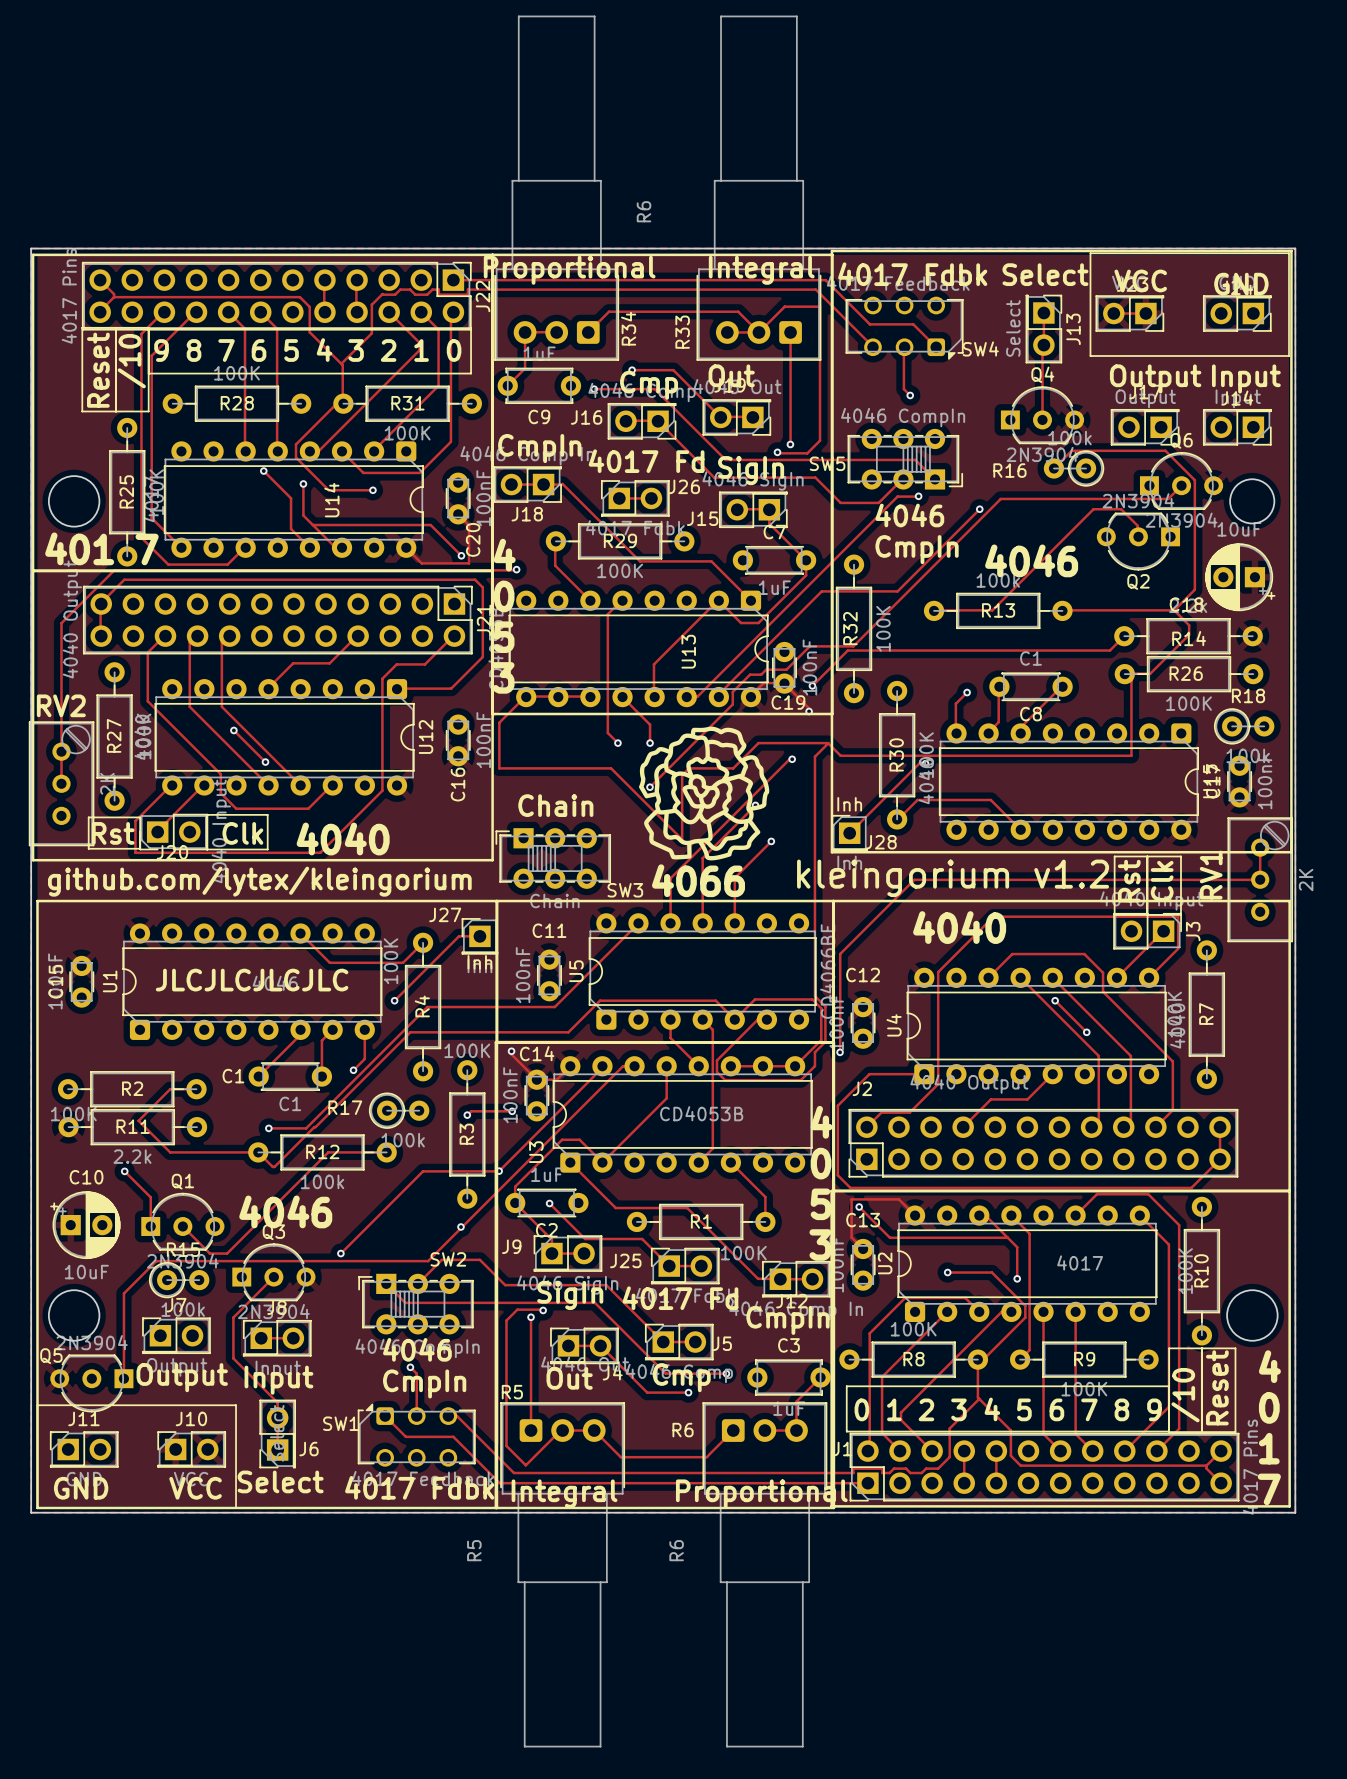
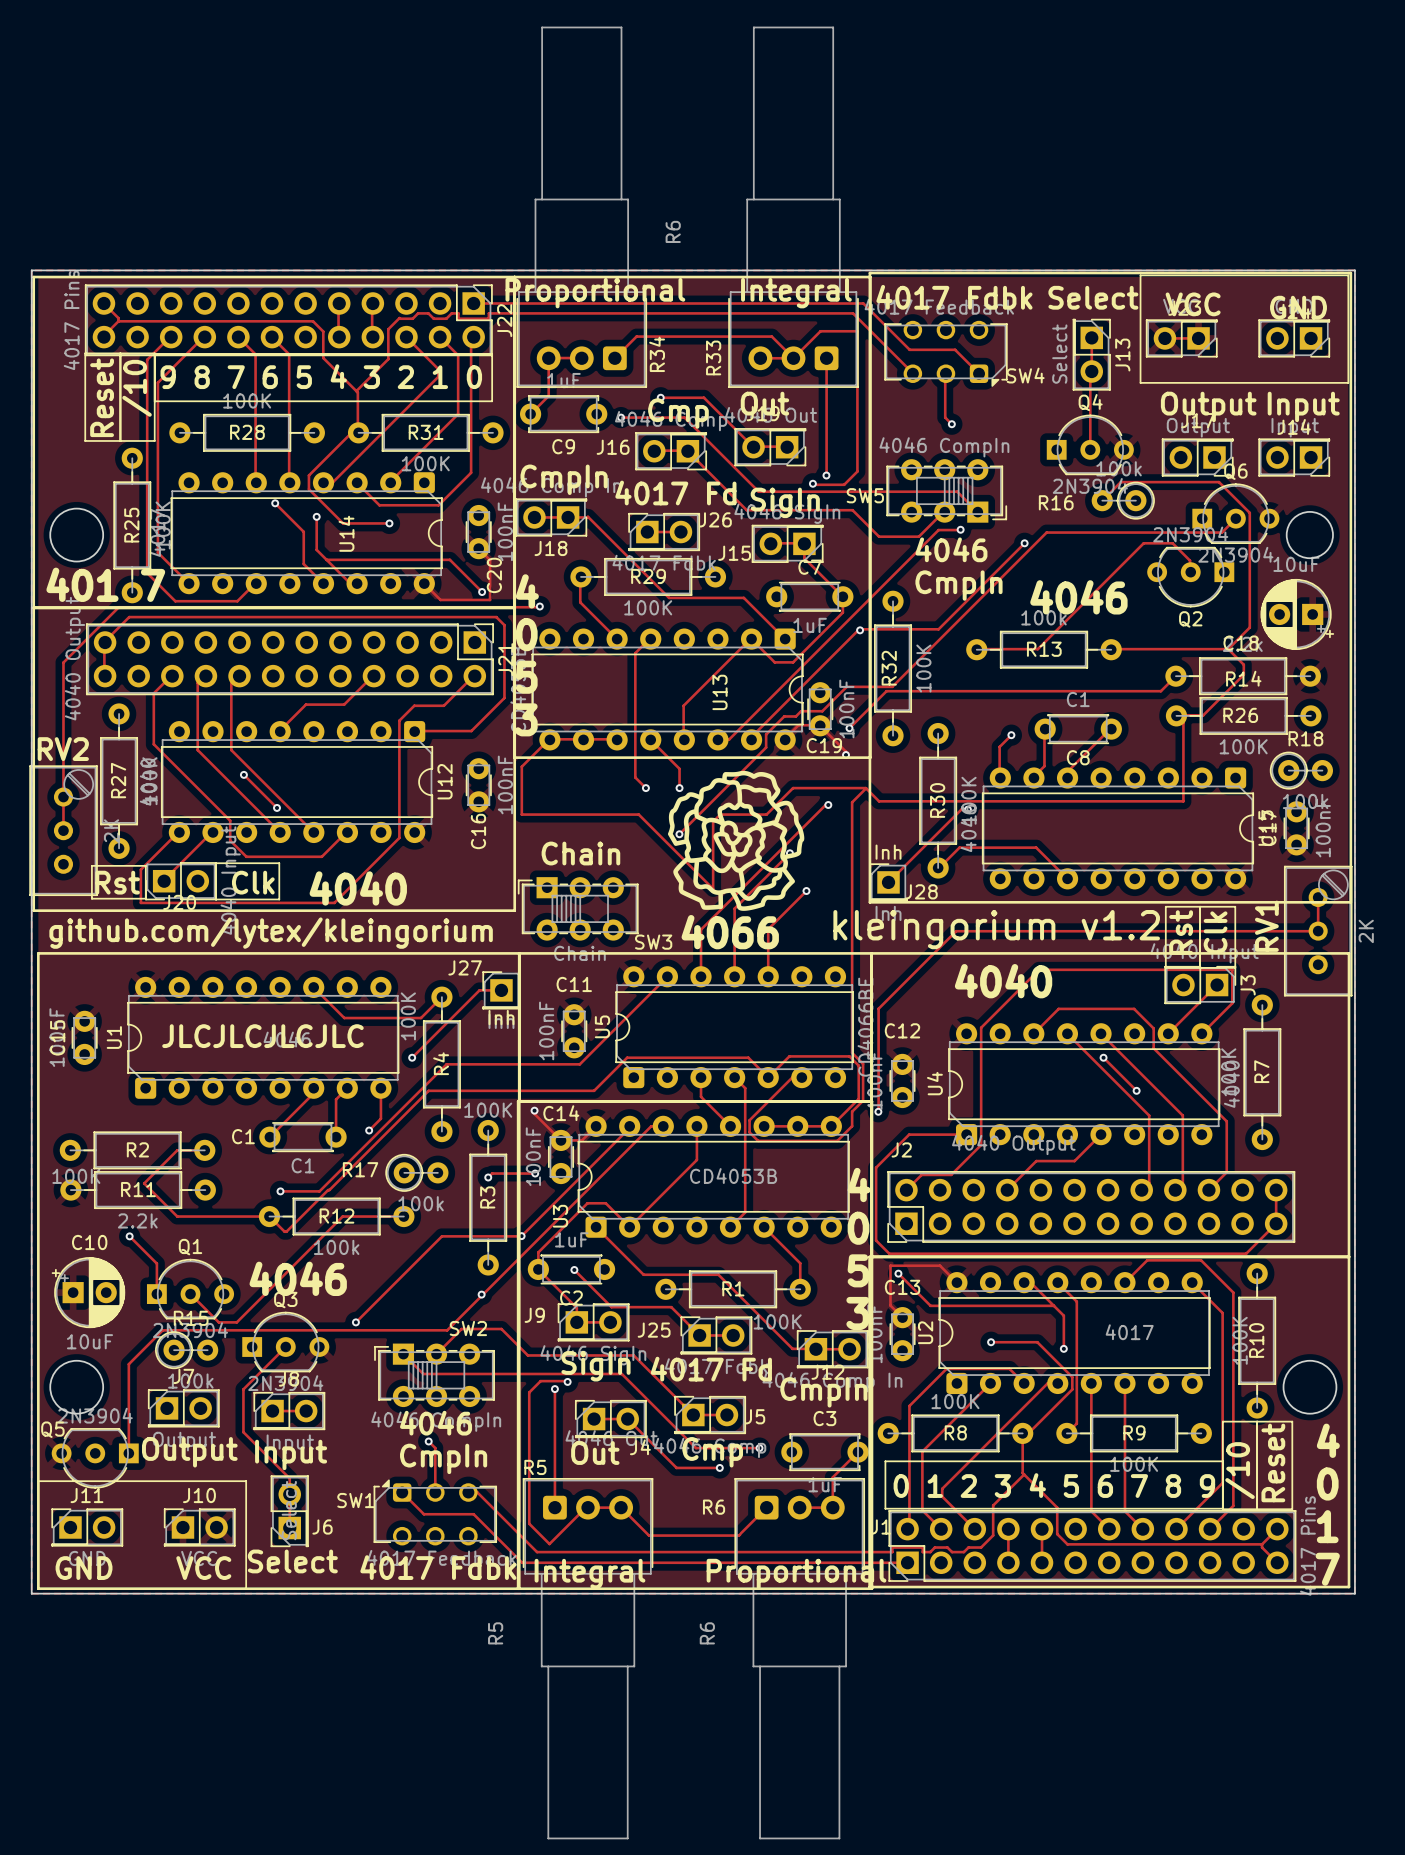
via: none -> (860, 630)

